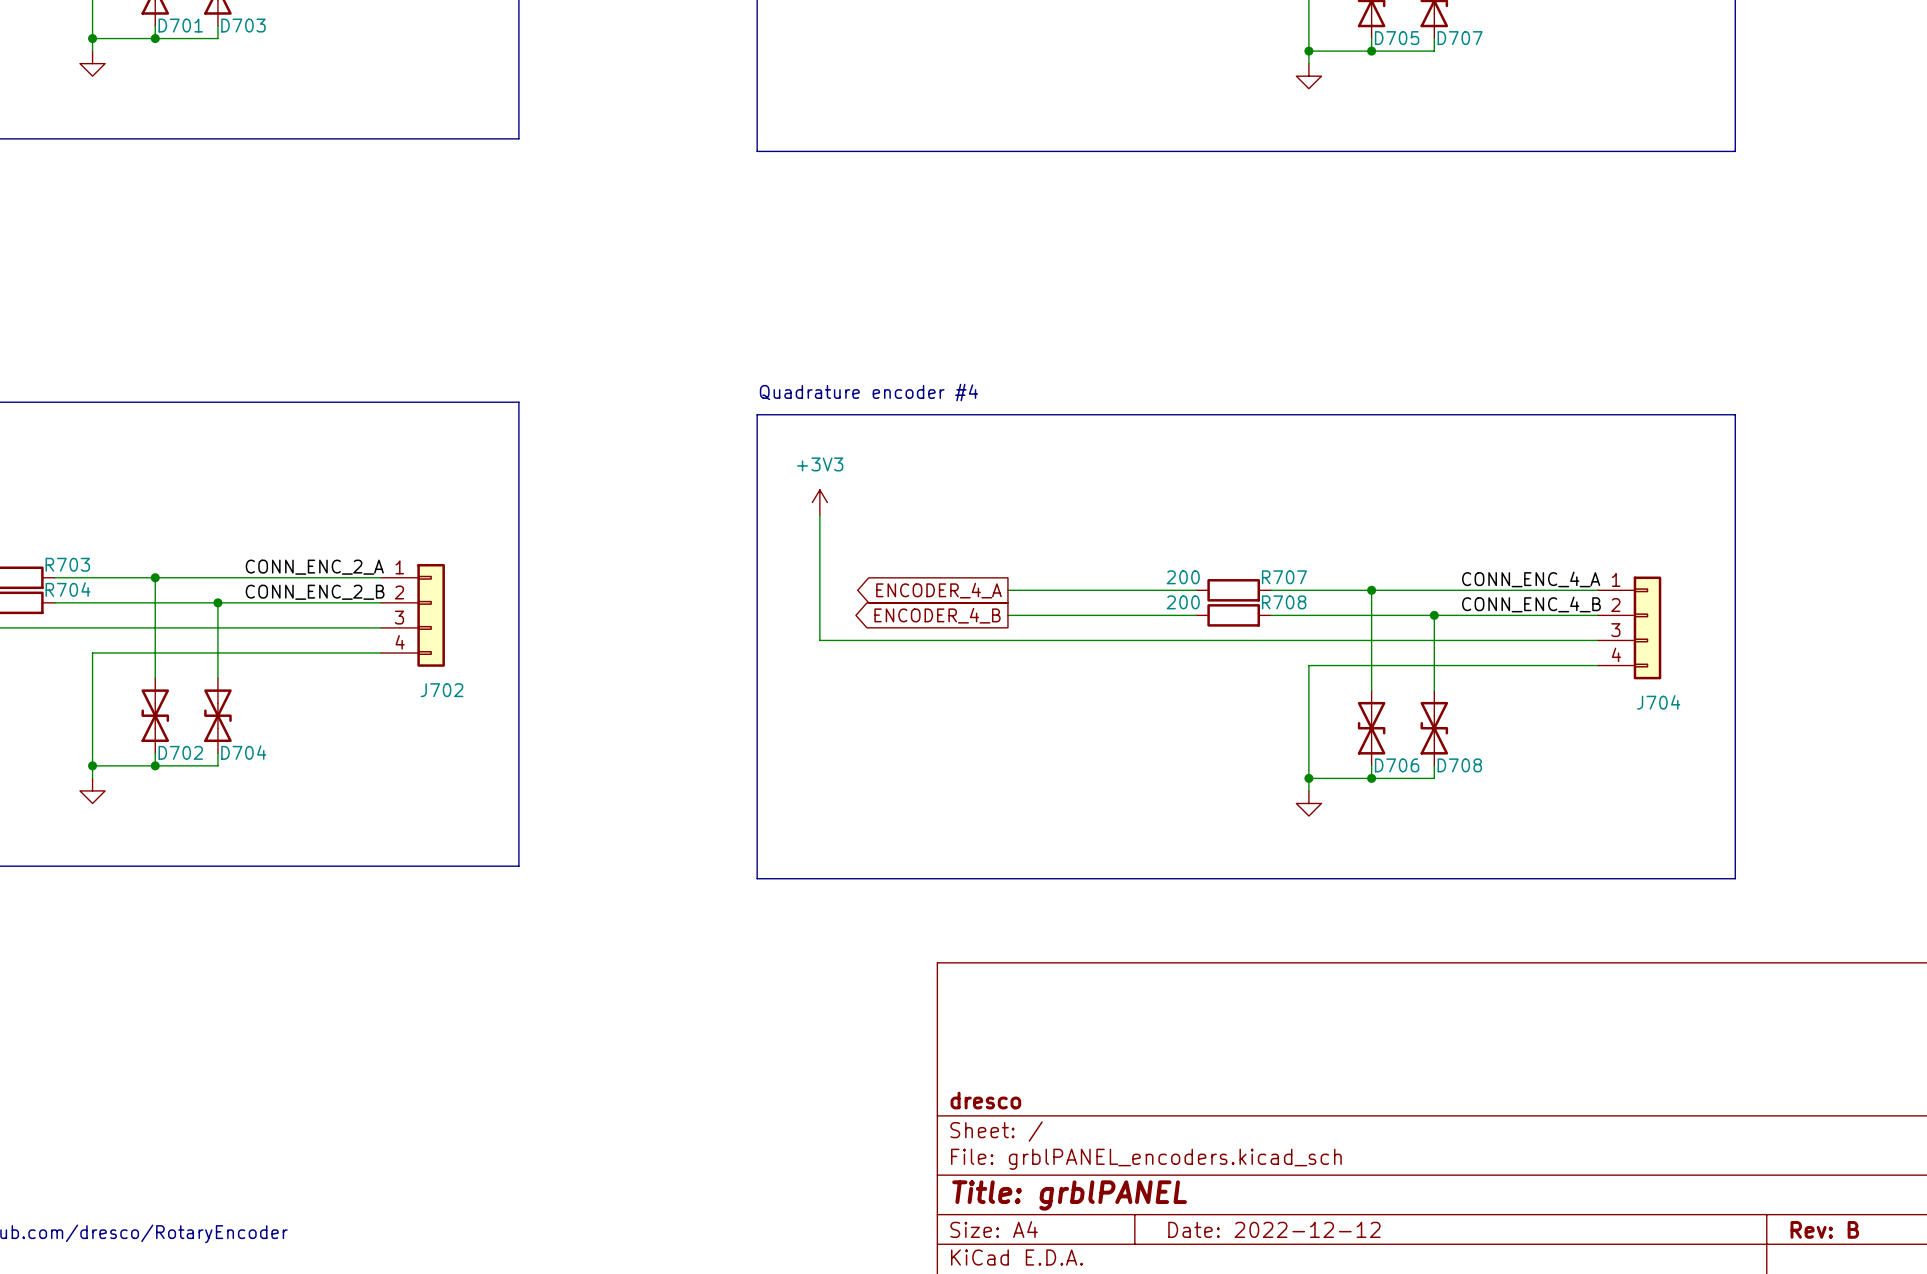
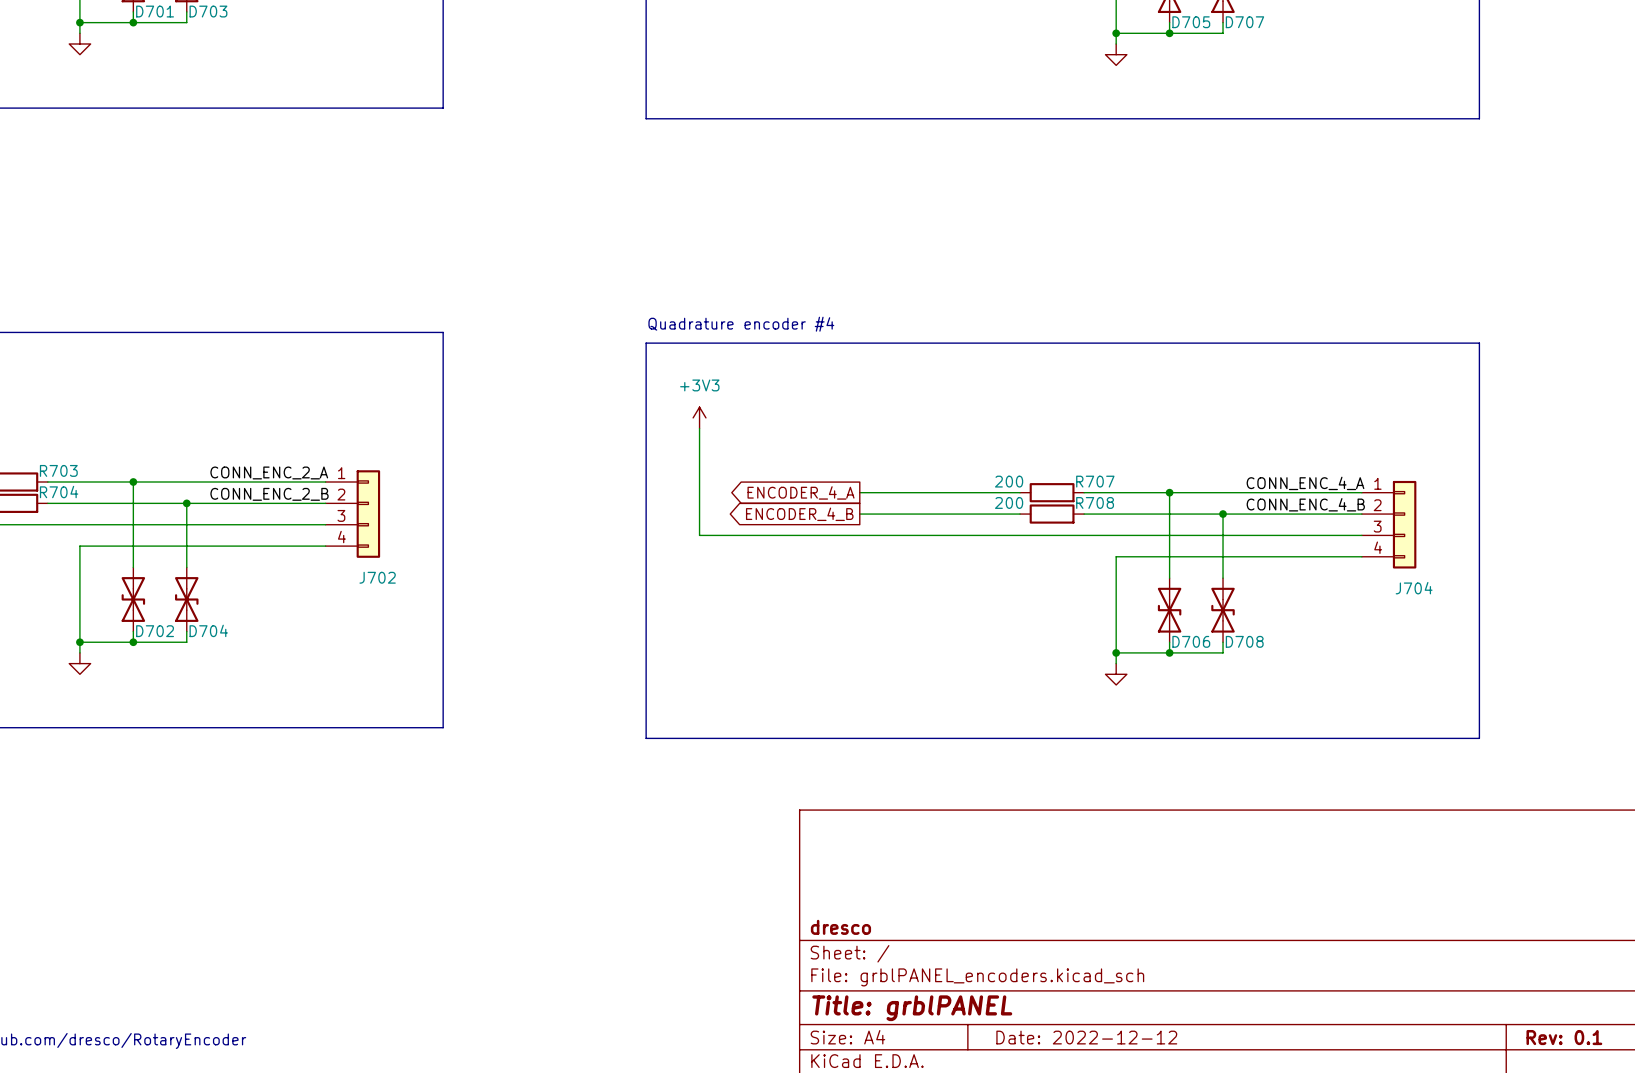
title block: Rev: B (1824, 1229) -> Rev: 0.1 (1564, 1037)

